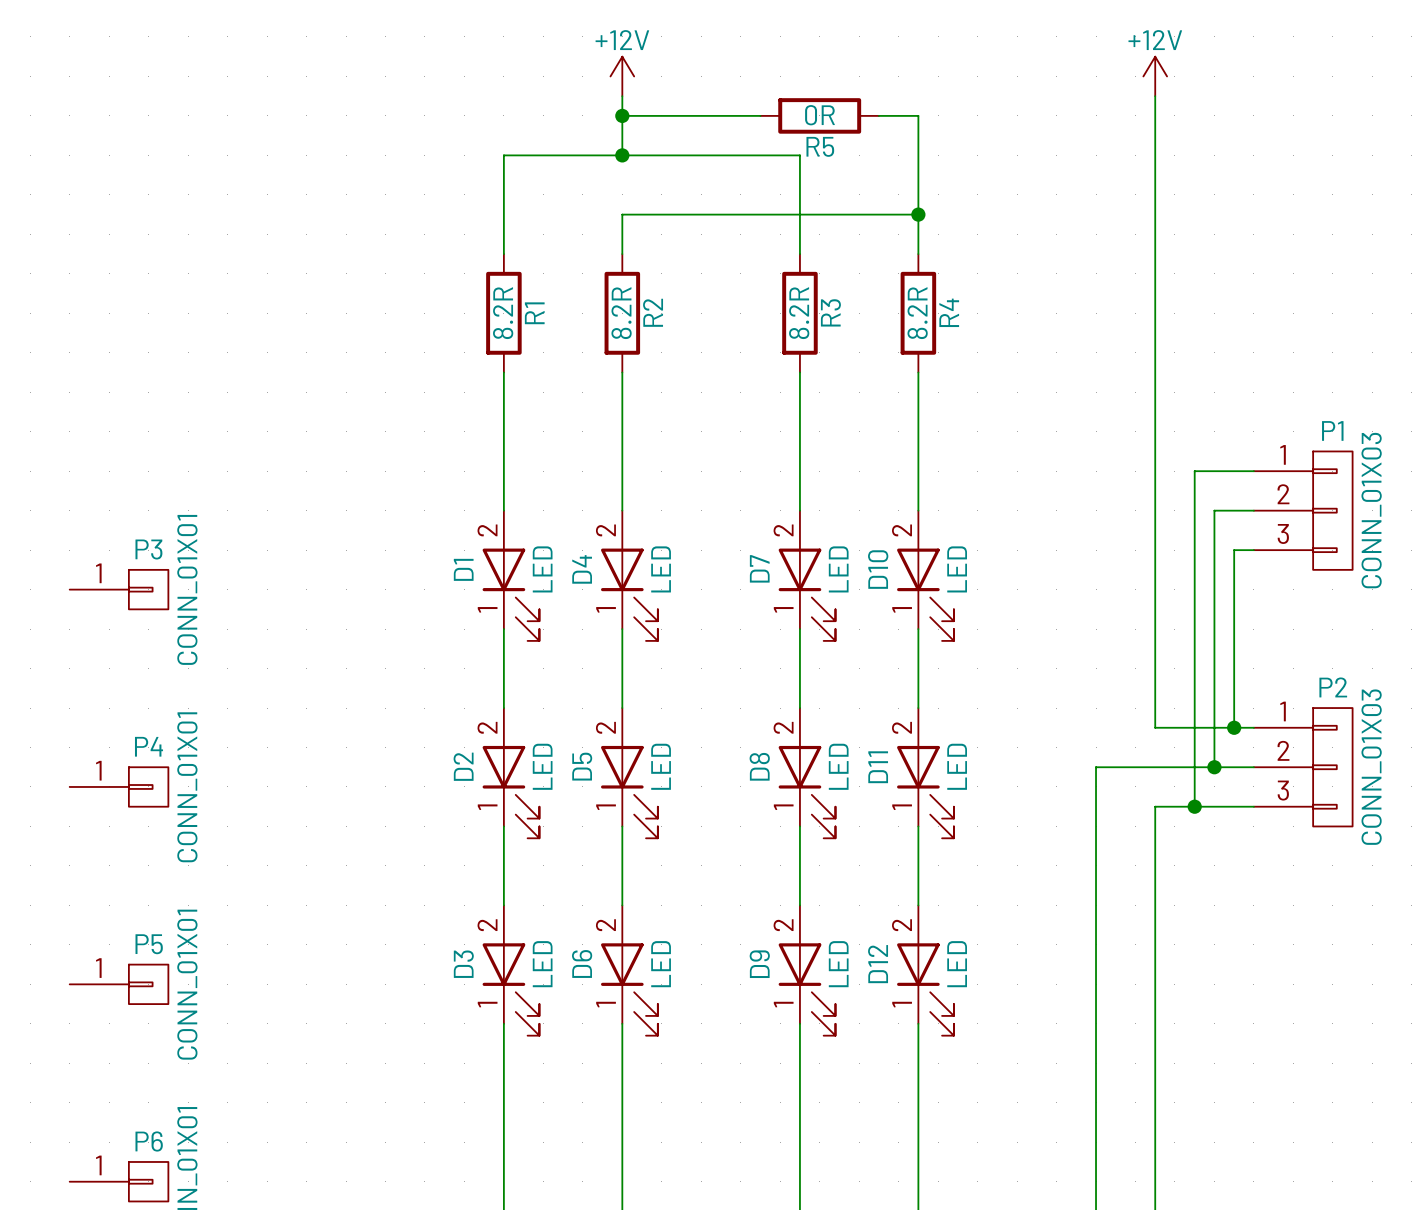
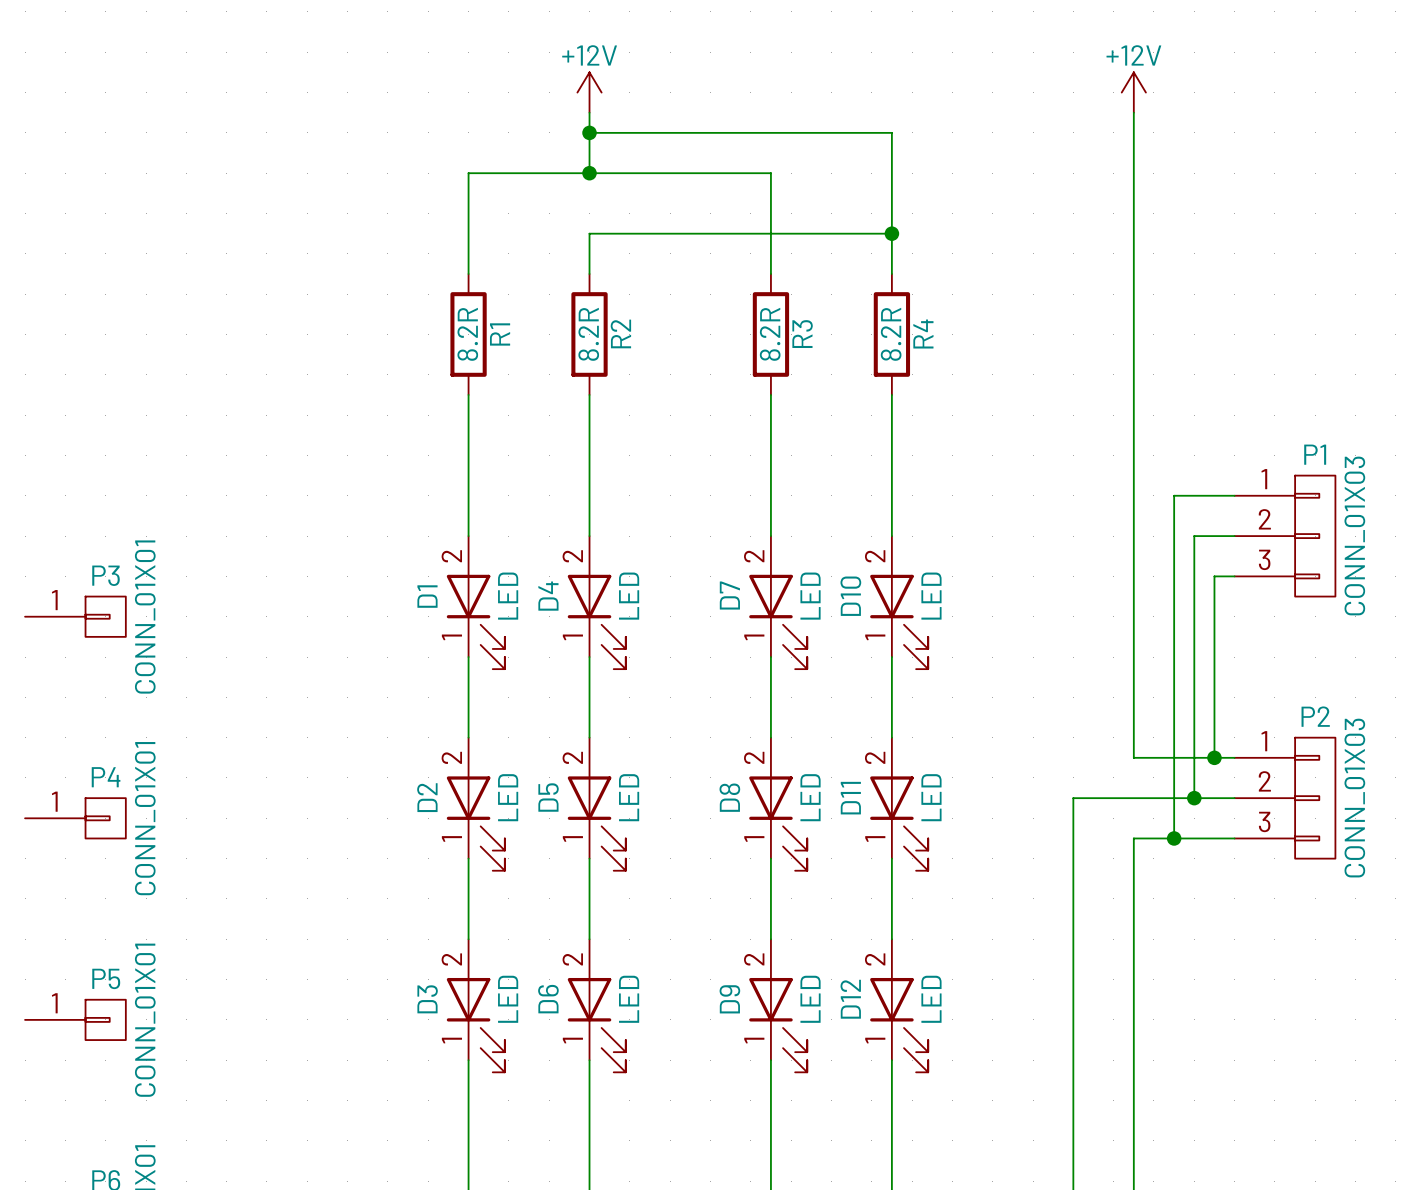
wire: none -> (730, 132) (851, 132)
R5: 0R (819, 115) -> none

